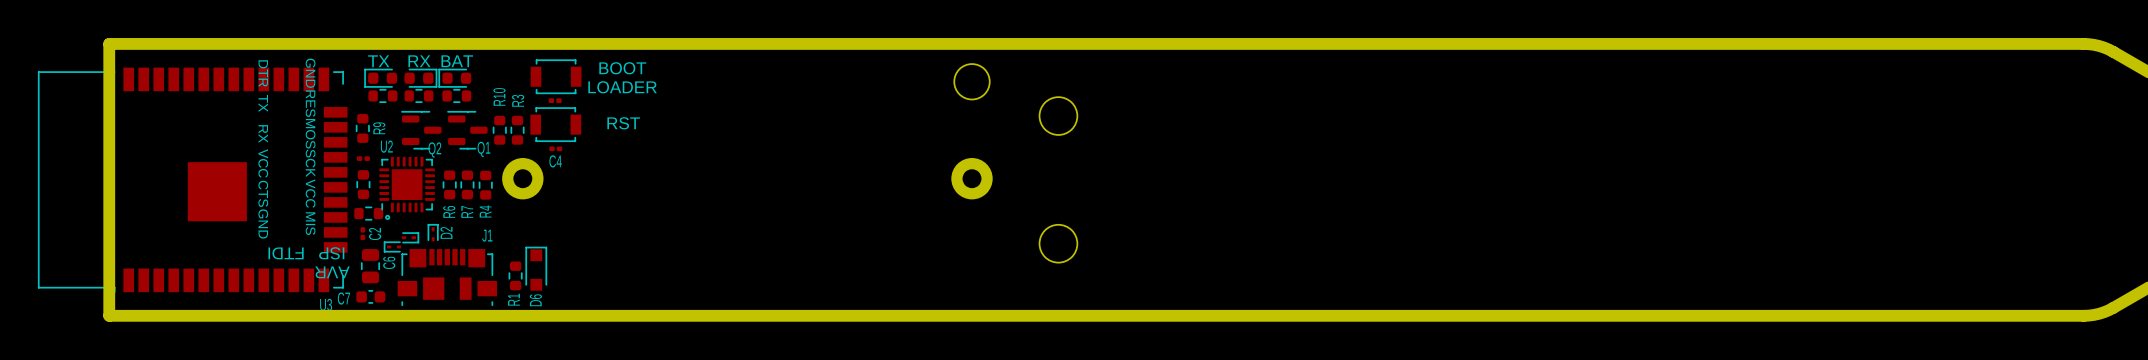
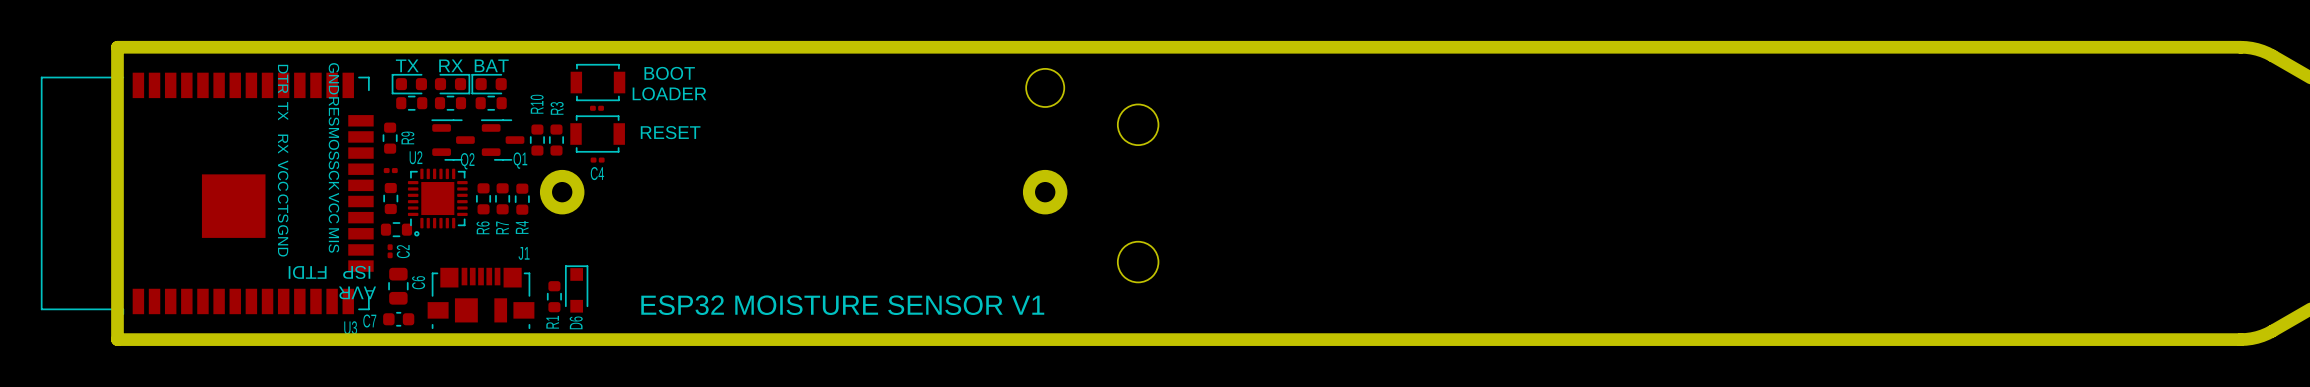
text: RST (623, 123) -> RESET (670, 132)
D2: (433, 232) -> none
part: (410, 237) -> none
part: (392, 246) -> none
text: none -> ESP32 MOISTURE SENSOR V1 (842, 305)

